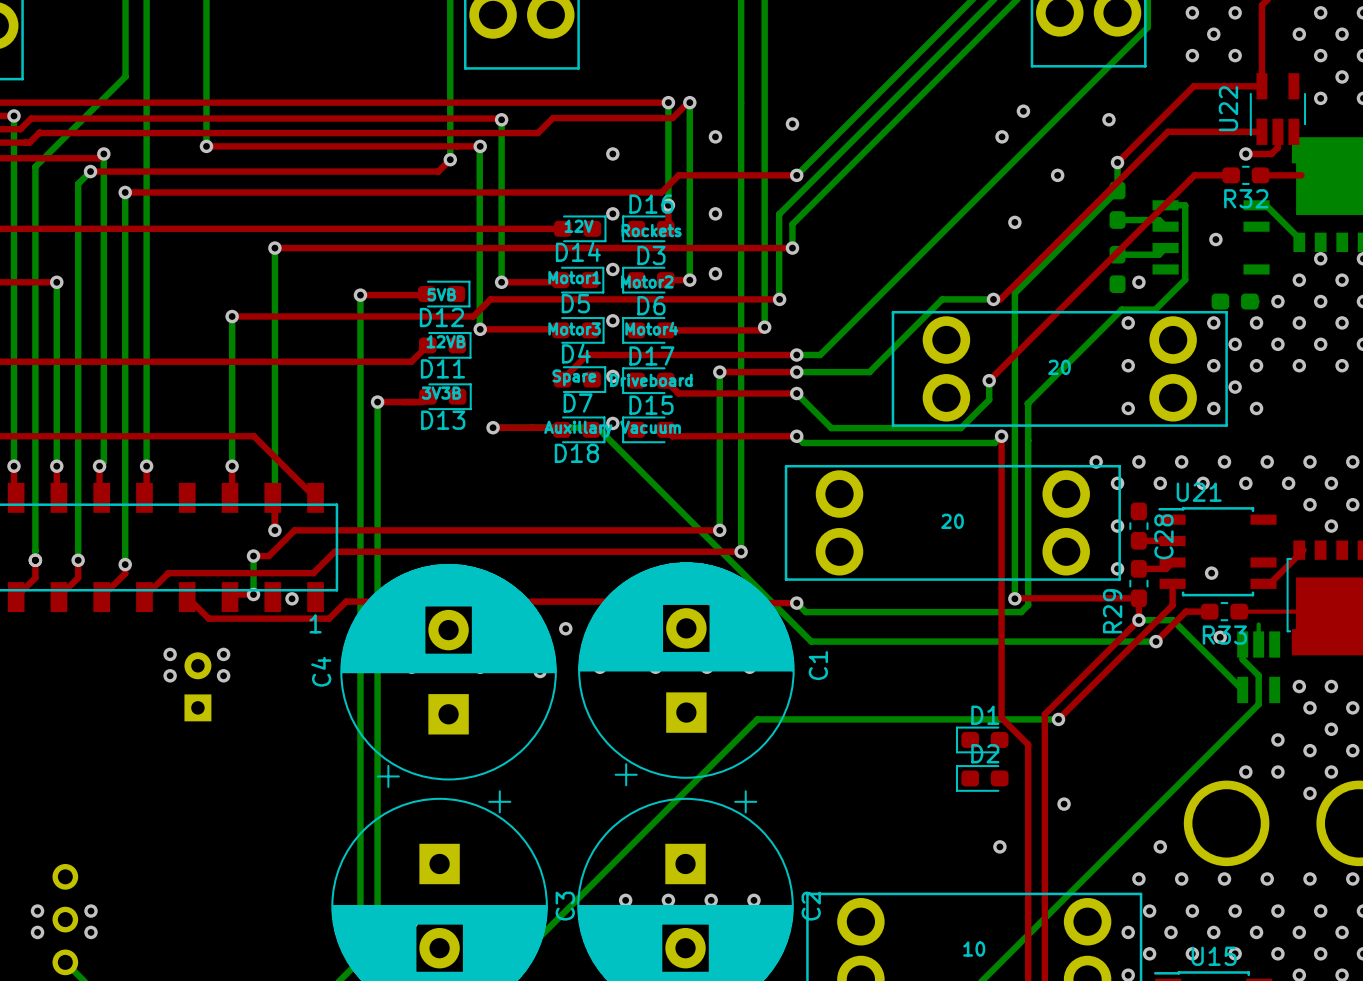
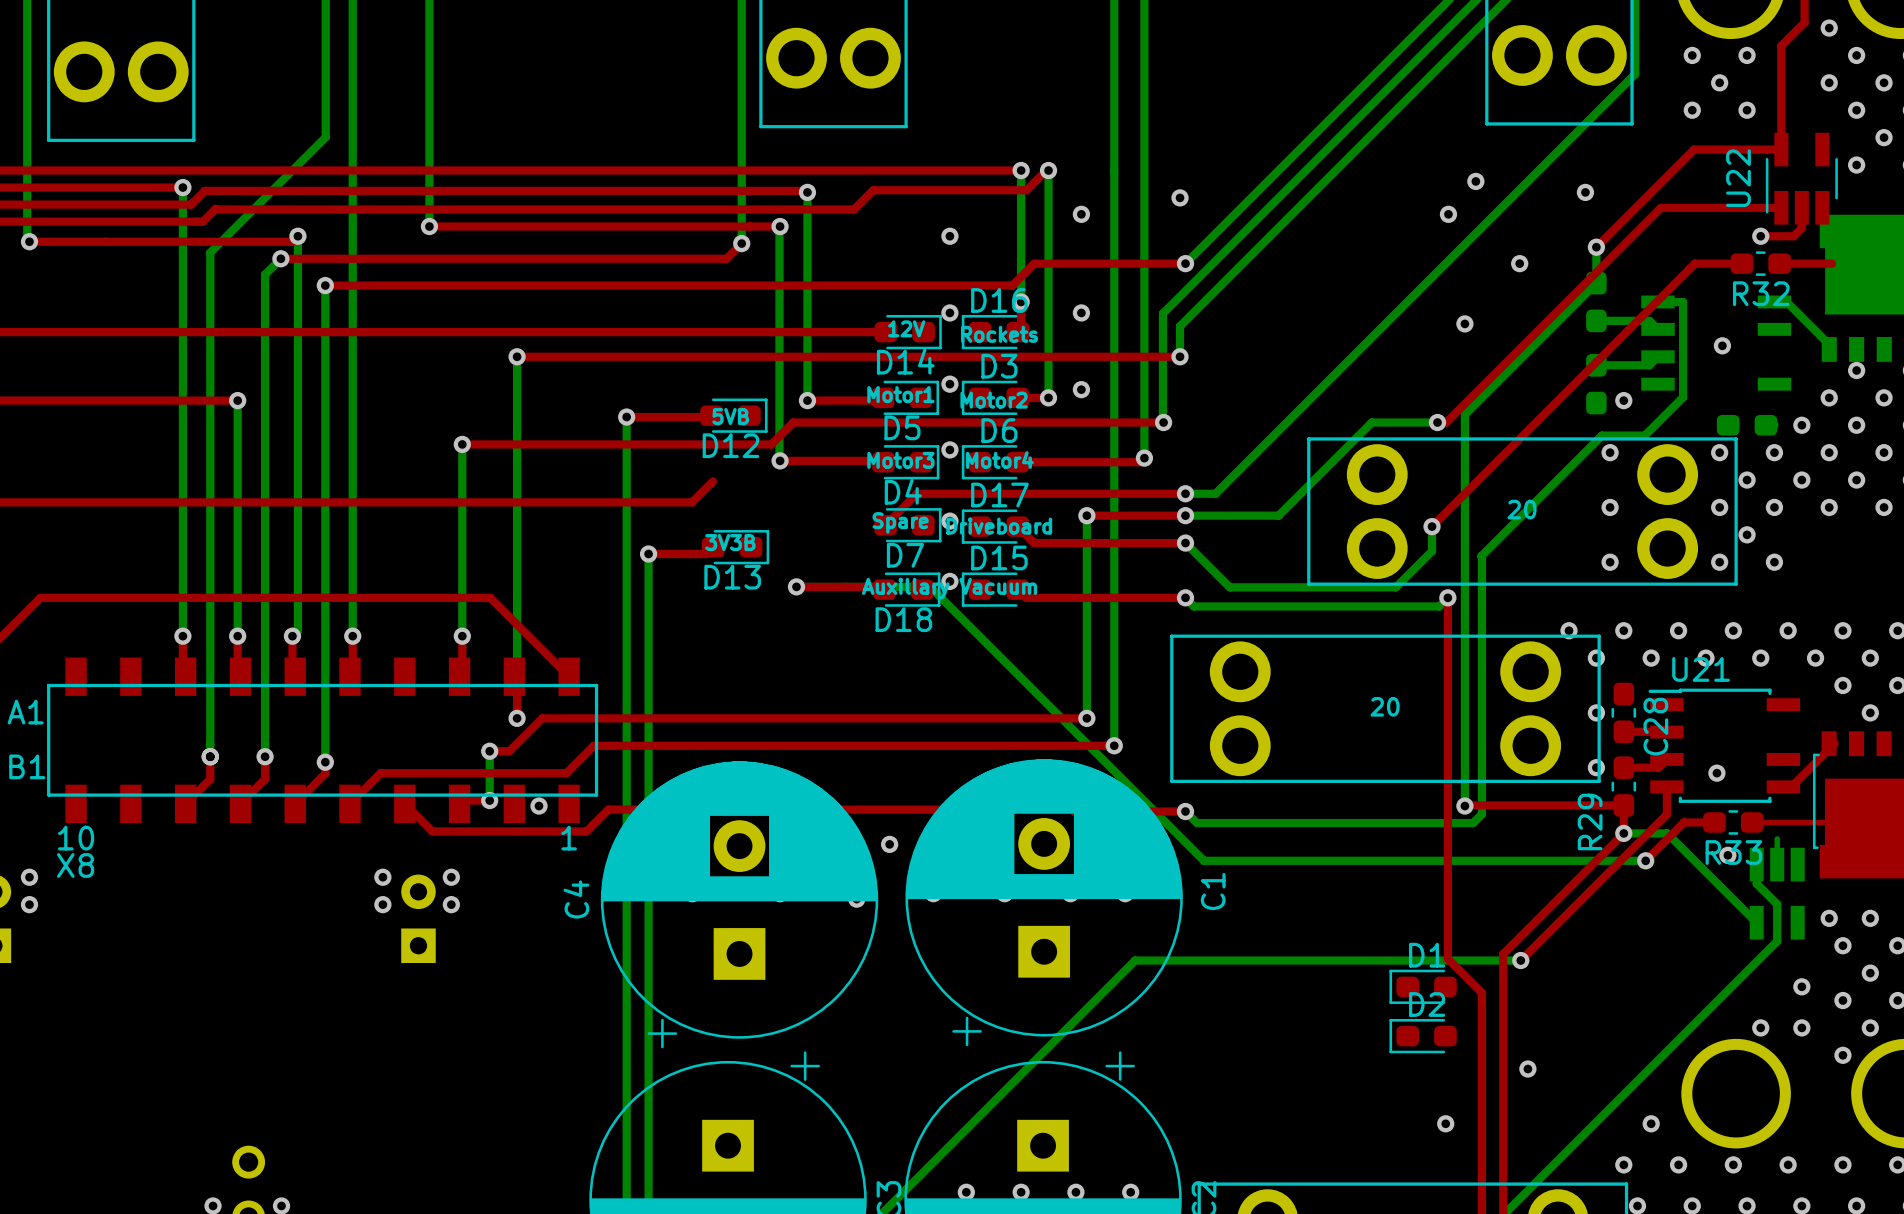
text: 12VB (446, 341) -> none
D11: (445, 345) -> none

